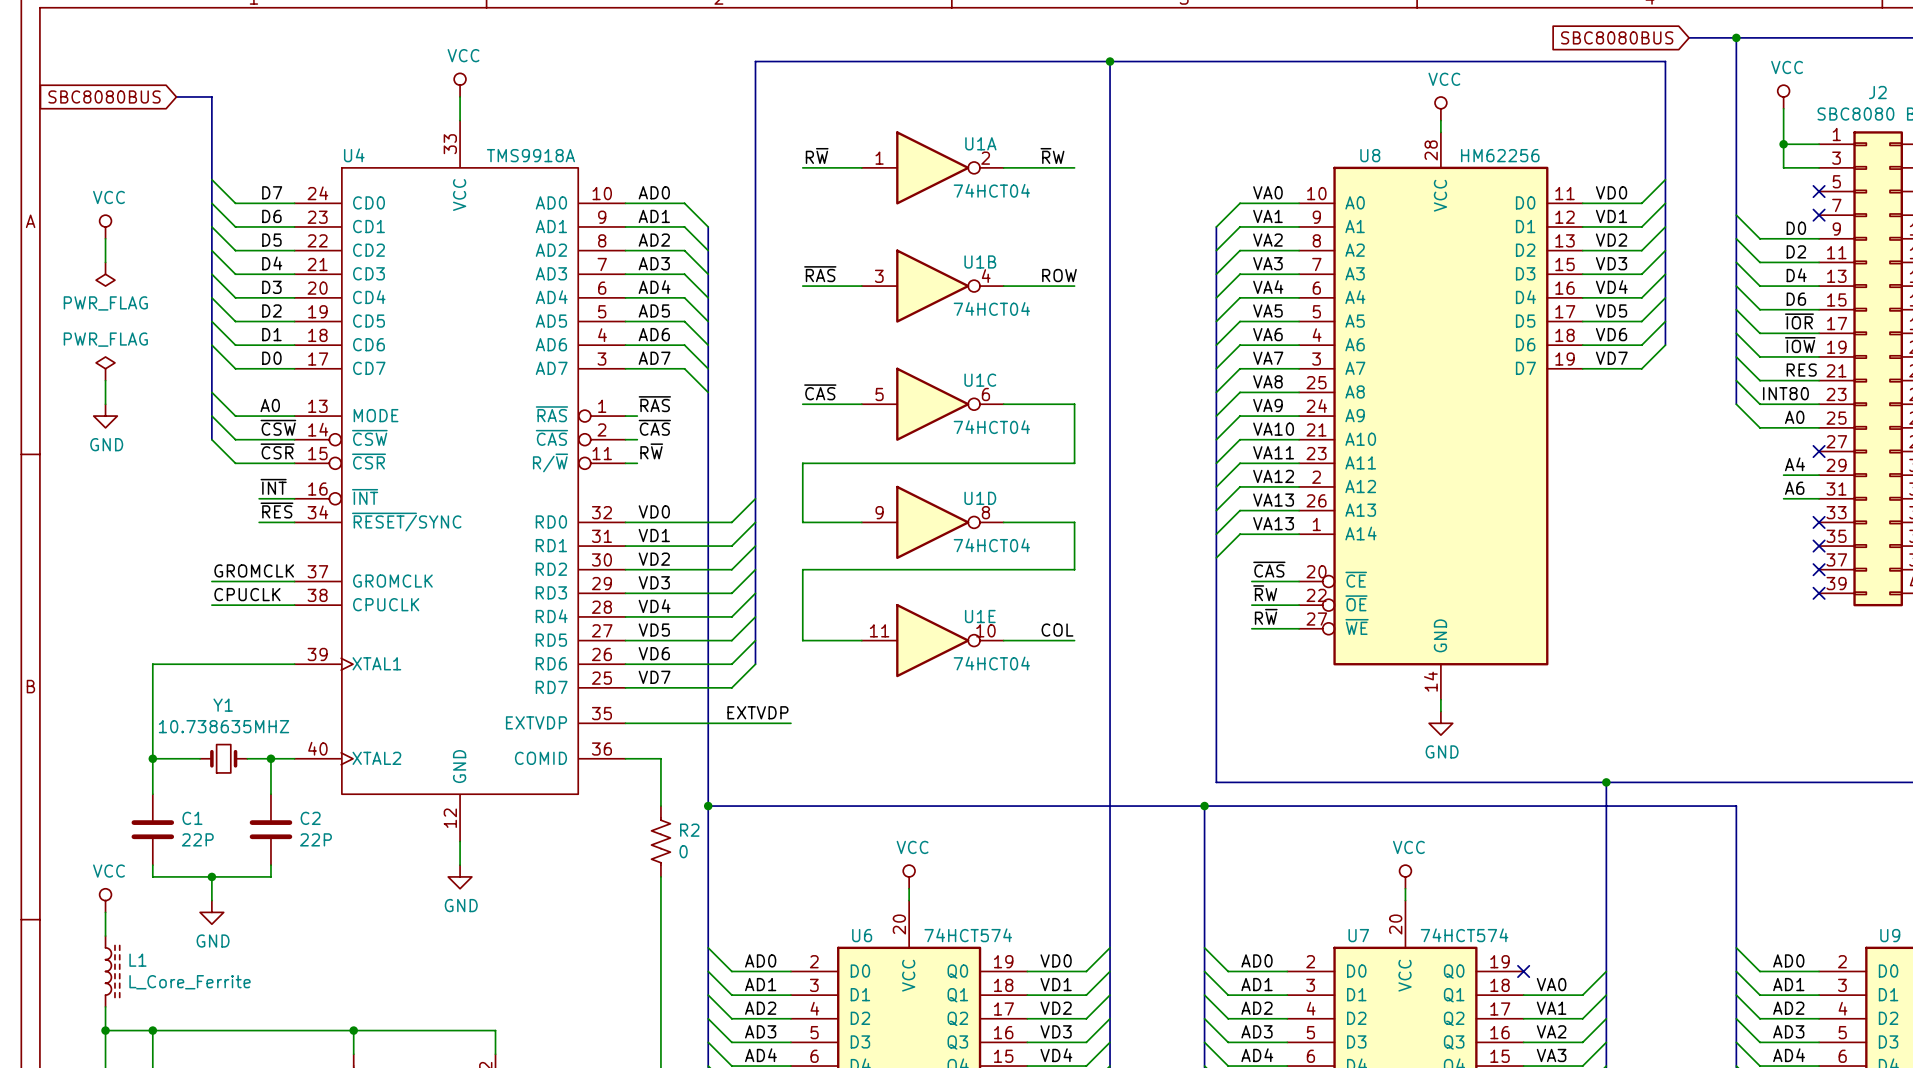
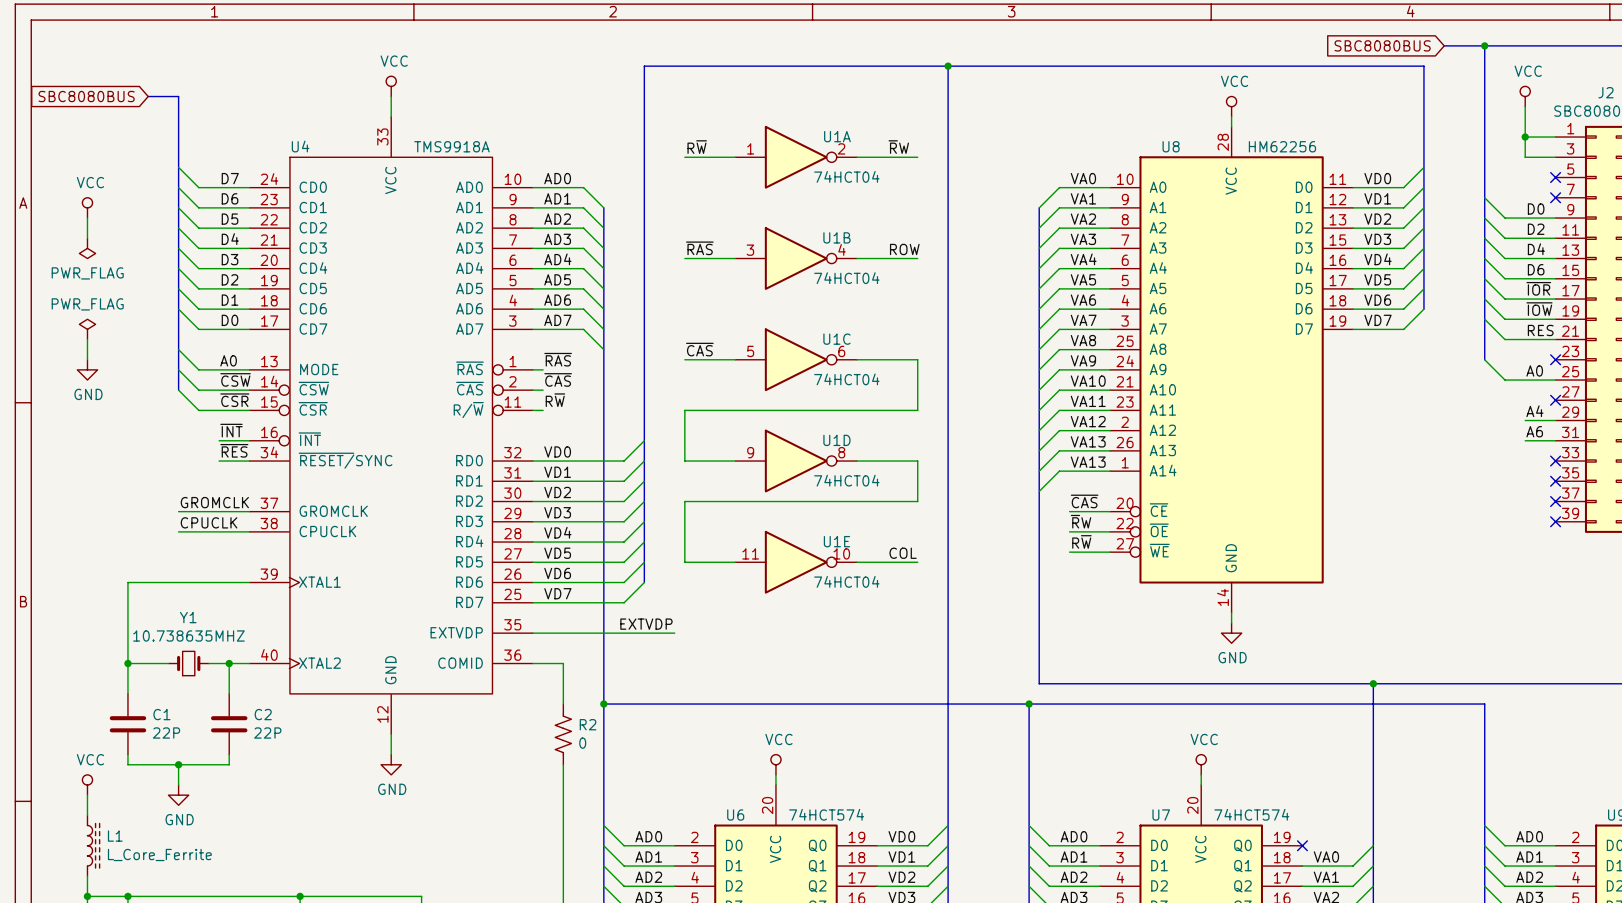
wire: (1736, 380) (1759, 404) (1819, 404) -> none
label: INT80 (1785, 393) -> none
no-connect mark: none -> (1555, 359)

